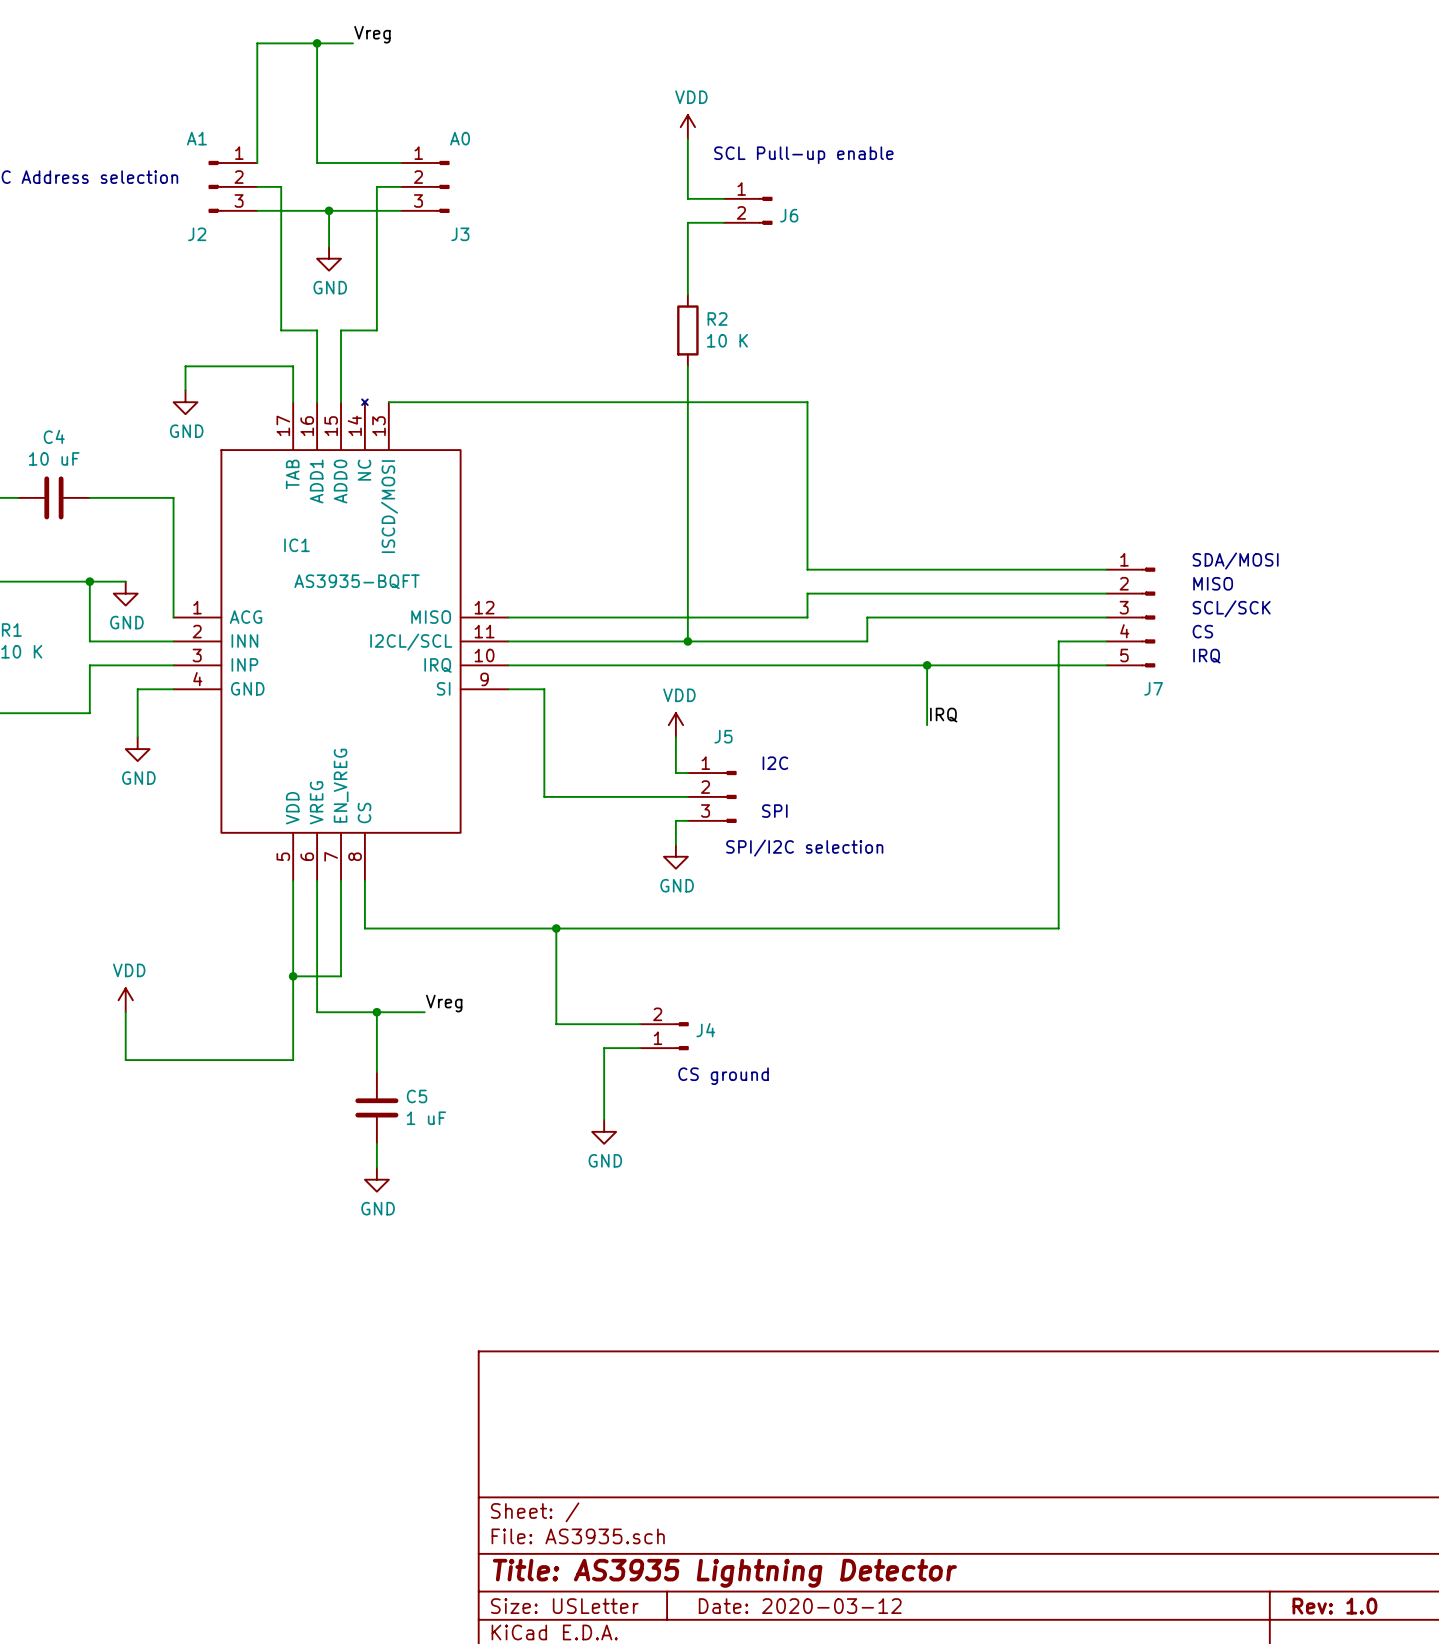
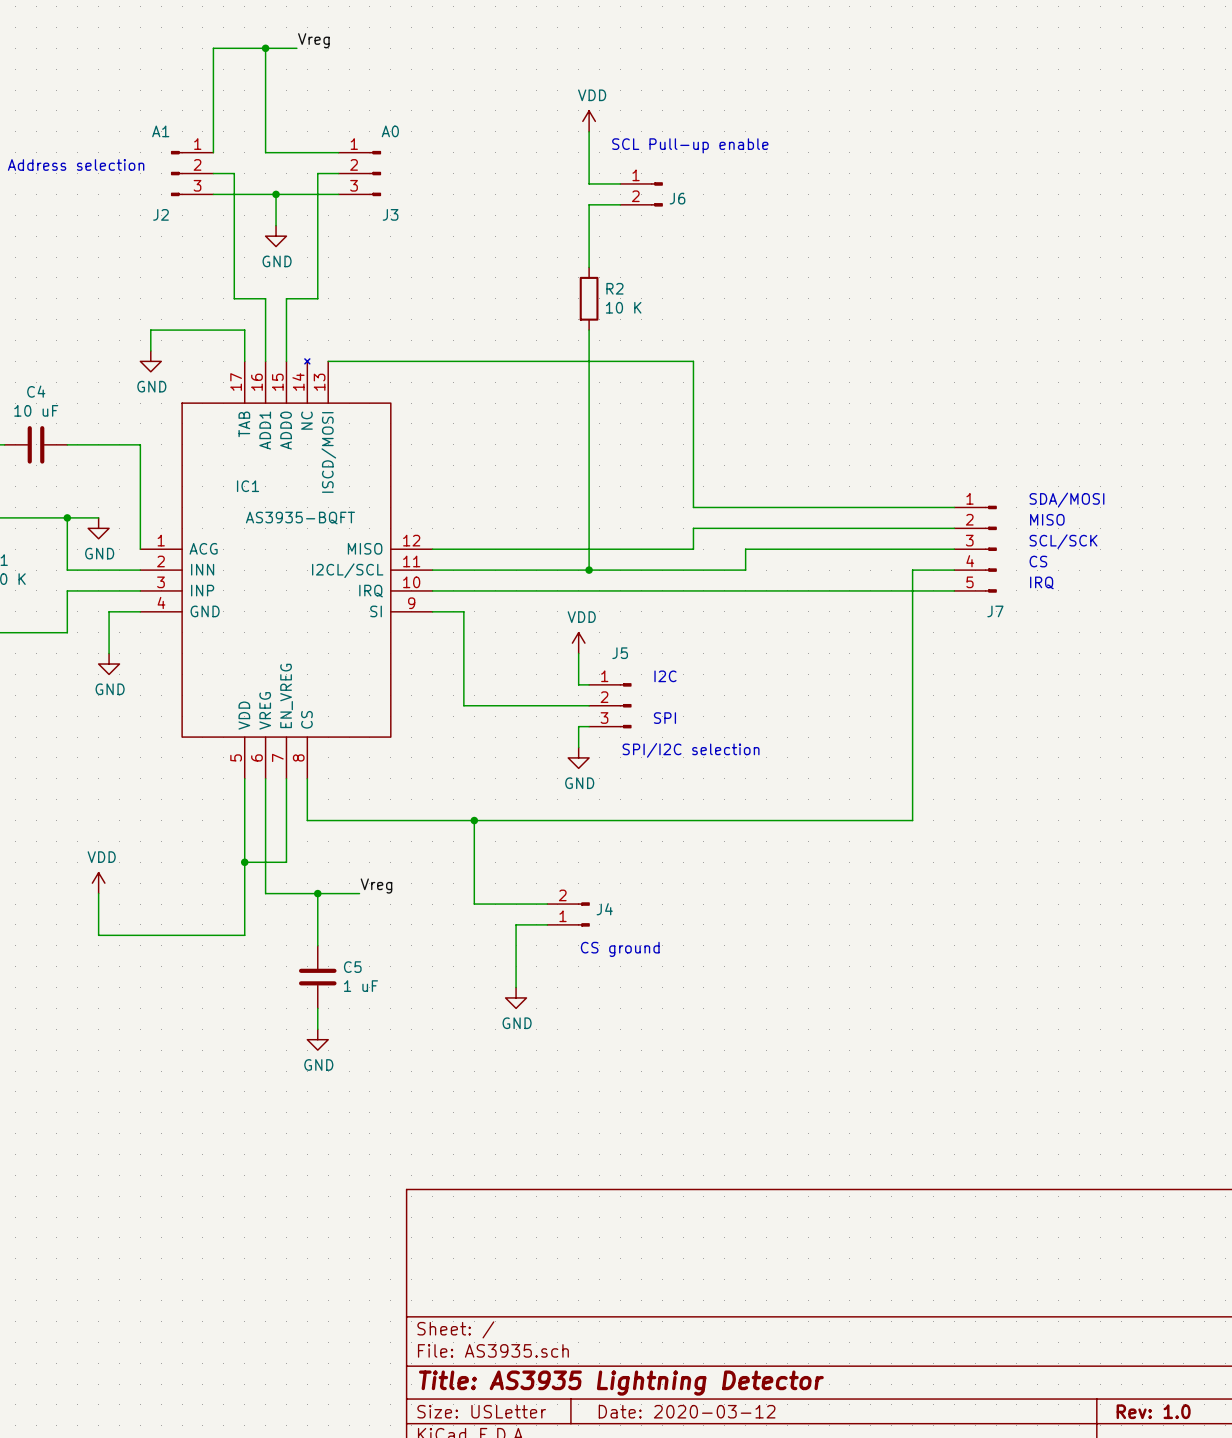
wire: (927, 665) (927, 725) -> none
junction: (927, 665) -> none
label: IRQ (943, 715) -> none

